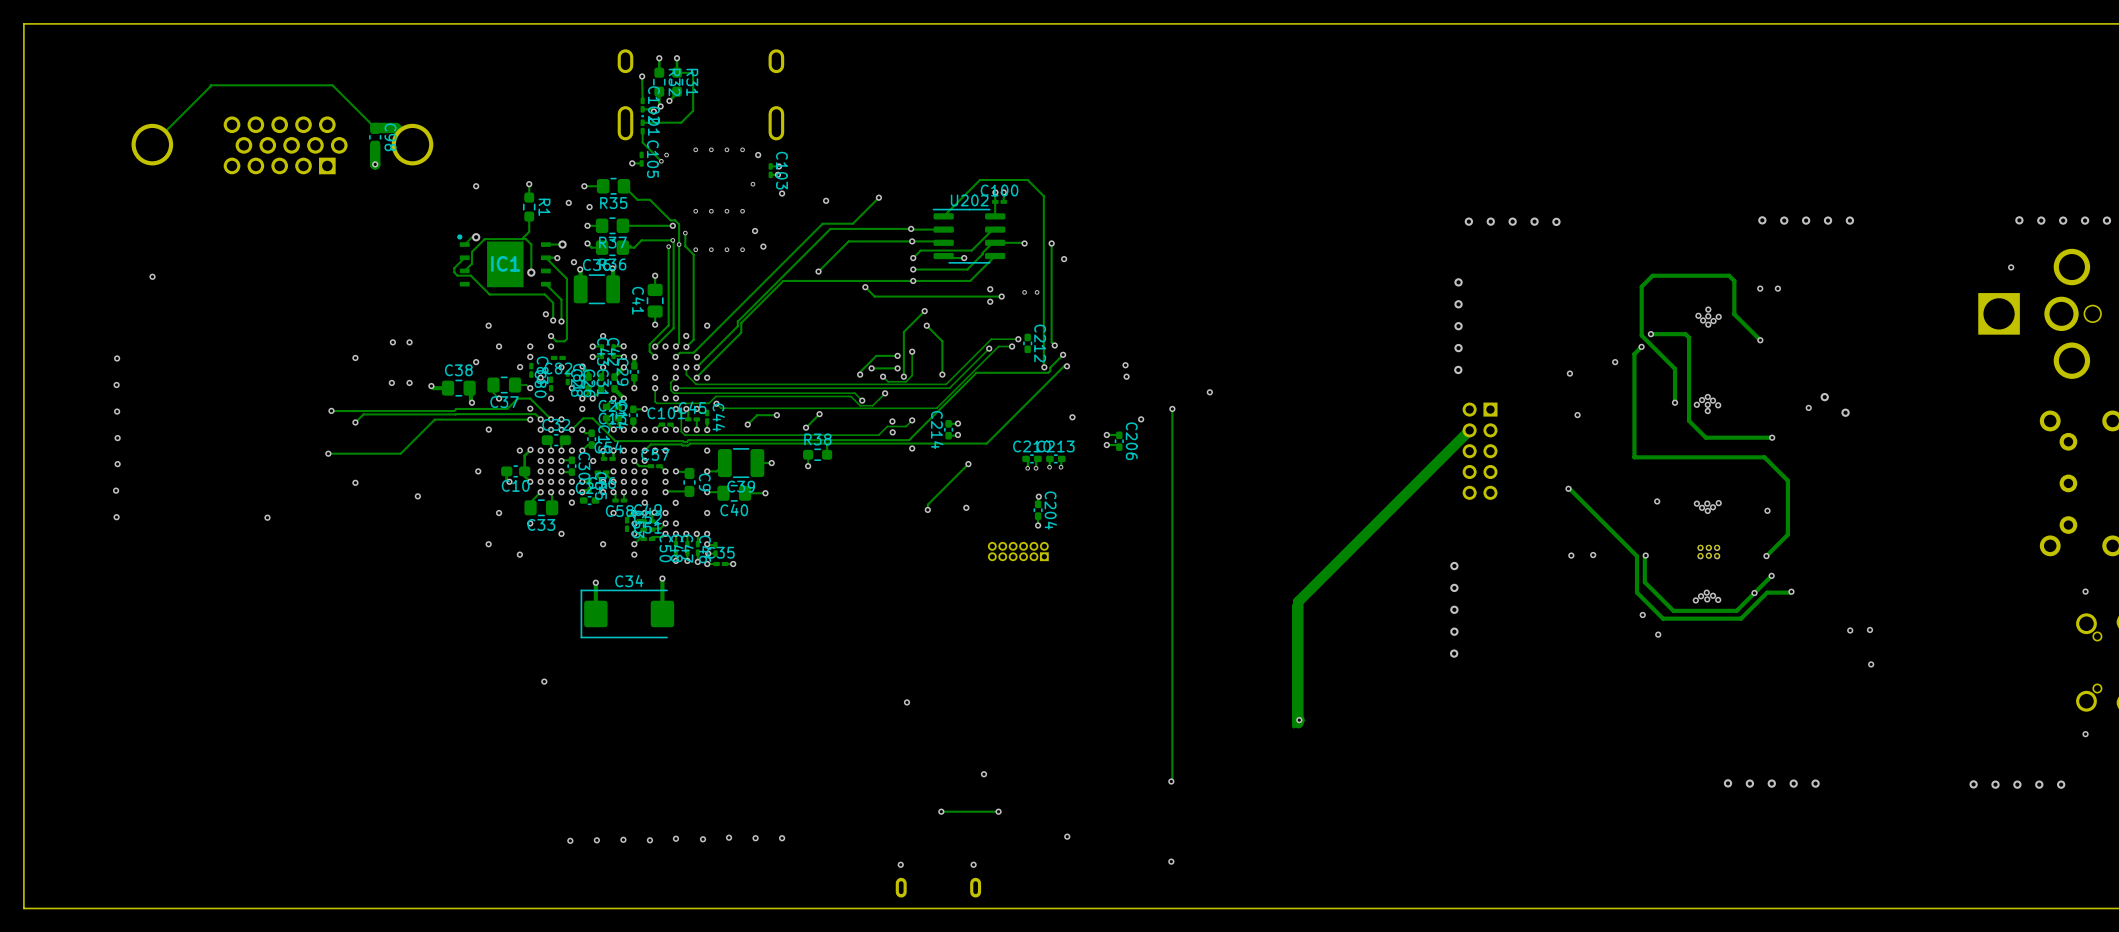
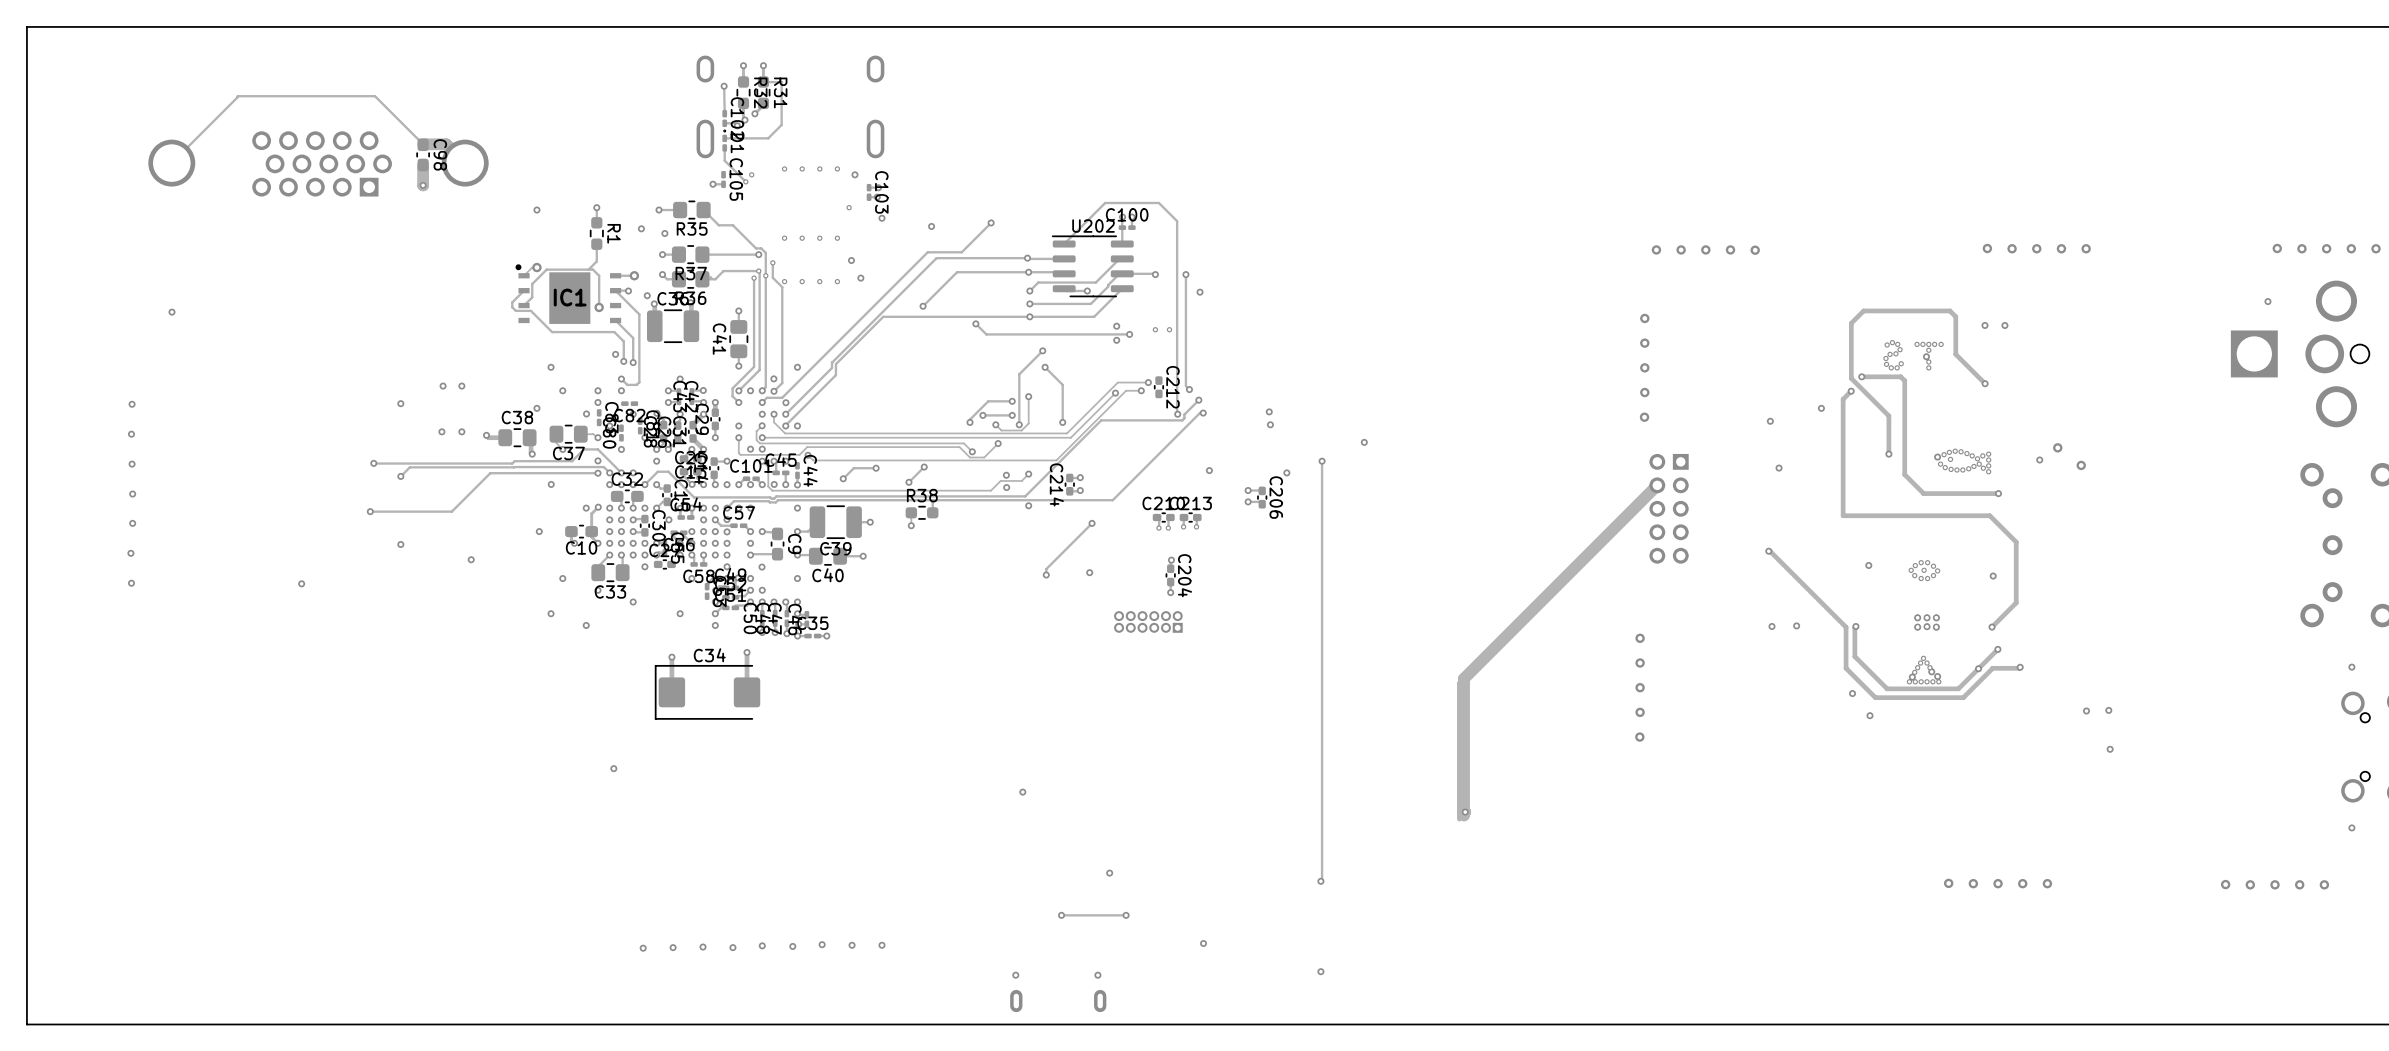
via: none -> (1892, 342)
via: none -> (1887, 344)
via: none -> (1897, 344)
via: none -> (1917, 344)
via: none -> (1922, 344)
via: none -> (1928, 344)
via: none -> (1934, 344)
via: none -> (1941, 344)
via: (1708, 309) -> none
via: none -> (1900, 349)
via: none -> (1928, 350)
via: none -> (1895, 353)
via: none -> (1890, 354)
via: (1698, 315) -> none
via: (1718, 316) -> none
via: none -> (1885, 358)
via: (1703, 320) -> none
via: none -> (1928, 362)
via: (1713, 321) -> none
via: none -> (1901, 363)
via: none -> (1886, 364)
via: (1708, 324) -> none
via: none -> (1891, 367)
via: none -> (1897, 367)
via: none -> (1928, 367)
via: (1707, 396) -> none
via: (1702, 400) -> none
via: (1712, 400) -> none
via: none -> (1955, 451)
via: none -> (1961, 451)
via: none -> (1949, 452)
via: none -> (1966, 453)
via: none -> (1988, 454)
via: none -> (1944, 454)
via: (1696, 404) -> none
via: (1707, 404) -> none
via: none -> (1972, 455)
via: none -> (1982, 455)
via: none -> (1977, 458)
via: none -> (1950, 459)
via: none -> (1988, 460)
via: (1707, 411) -> none
via: none -> (1940, 464)
via: none -> (1979, 464)
via: none -> (1973, 466)
via: none -> (1988, 465)
via: none -> (1945, 467)
via: none -> (1968, 468)
via: none -> (1983, 468)
via: none -> (1951, 469)
via: none -> (1956, 469)
via: none -> (1962, 469)
via: none -> (1988, 471)
via: none -> (1921, 562)
via: none -> (1927, 562)
via: none -> (1915, 565)
via: none -> (1933, 566)
via: (1696, 503) -> none
via: (1707, 503) -> none
via: (1718, 503) -> none
via: none -> (1911, 570)
via: none -> (1924, 570)
via: none -> (1937, 570)
via: (1702, 507) -> none
via: (1712, 507) -> none
via: none -> (1914, 575)
via: (1707, 510) -> none
via: none -> (1933, 575)
via: none -> (1921, 578)
via: none -> (1927, 578)
via: none -> (1923, 658)
via: none -> (1920, 663)
via: none -> (1927, 663)
via: none -> (1917, 667)
via: (1706, 592) -> none
via: none -> (1929, 667)
via: none -> (1914, 672)
via: (1701, 596) -> none
via: (1707, 599) -> none
via: none -> (1909, 681)
via: none -> (1915, 681)
via: none -> (1921, 681)
via: none -> (1927, 681)
via: none -> (1932, 681)
via: none -> (1938, 681)

